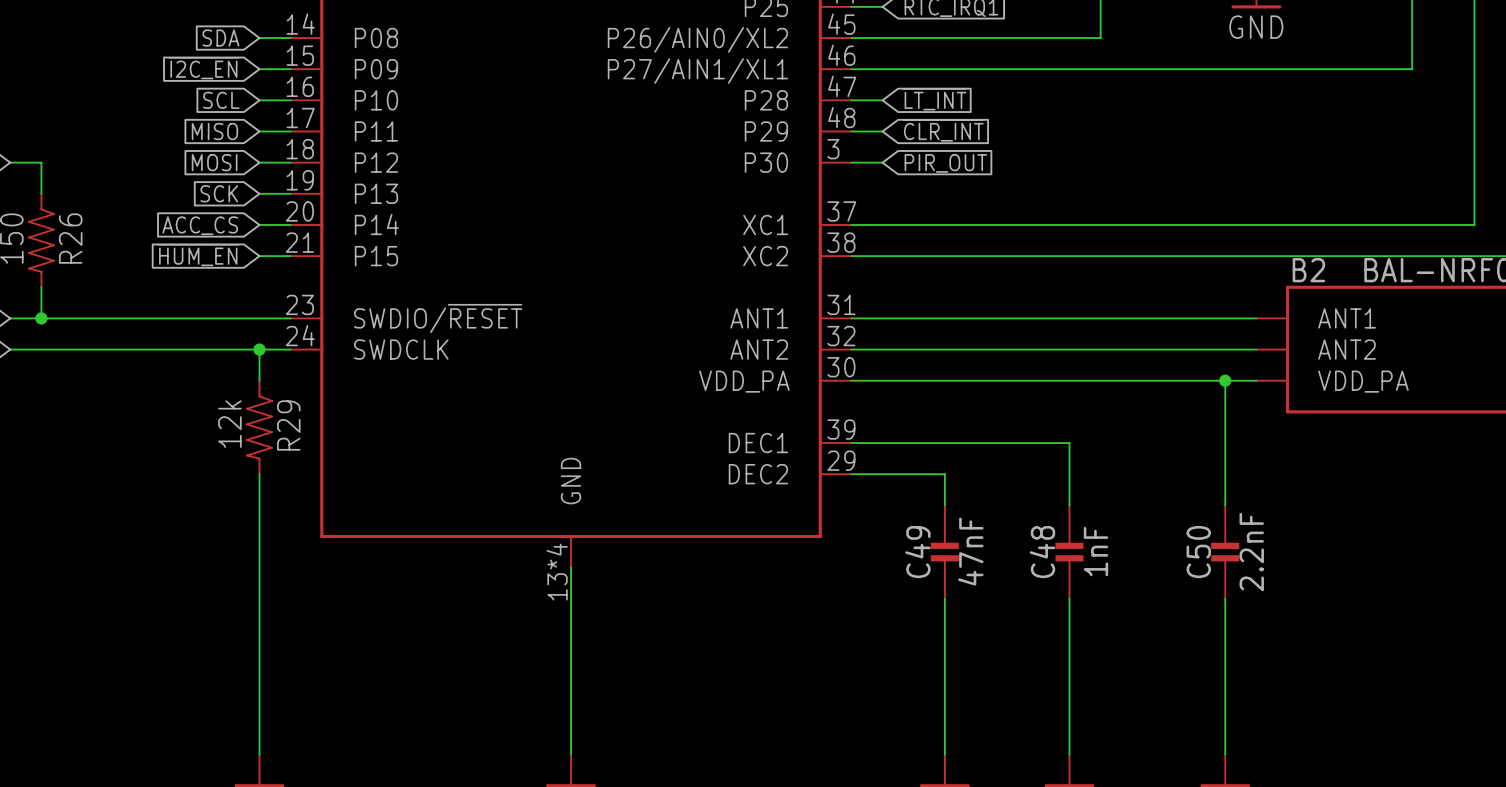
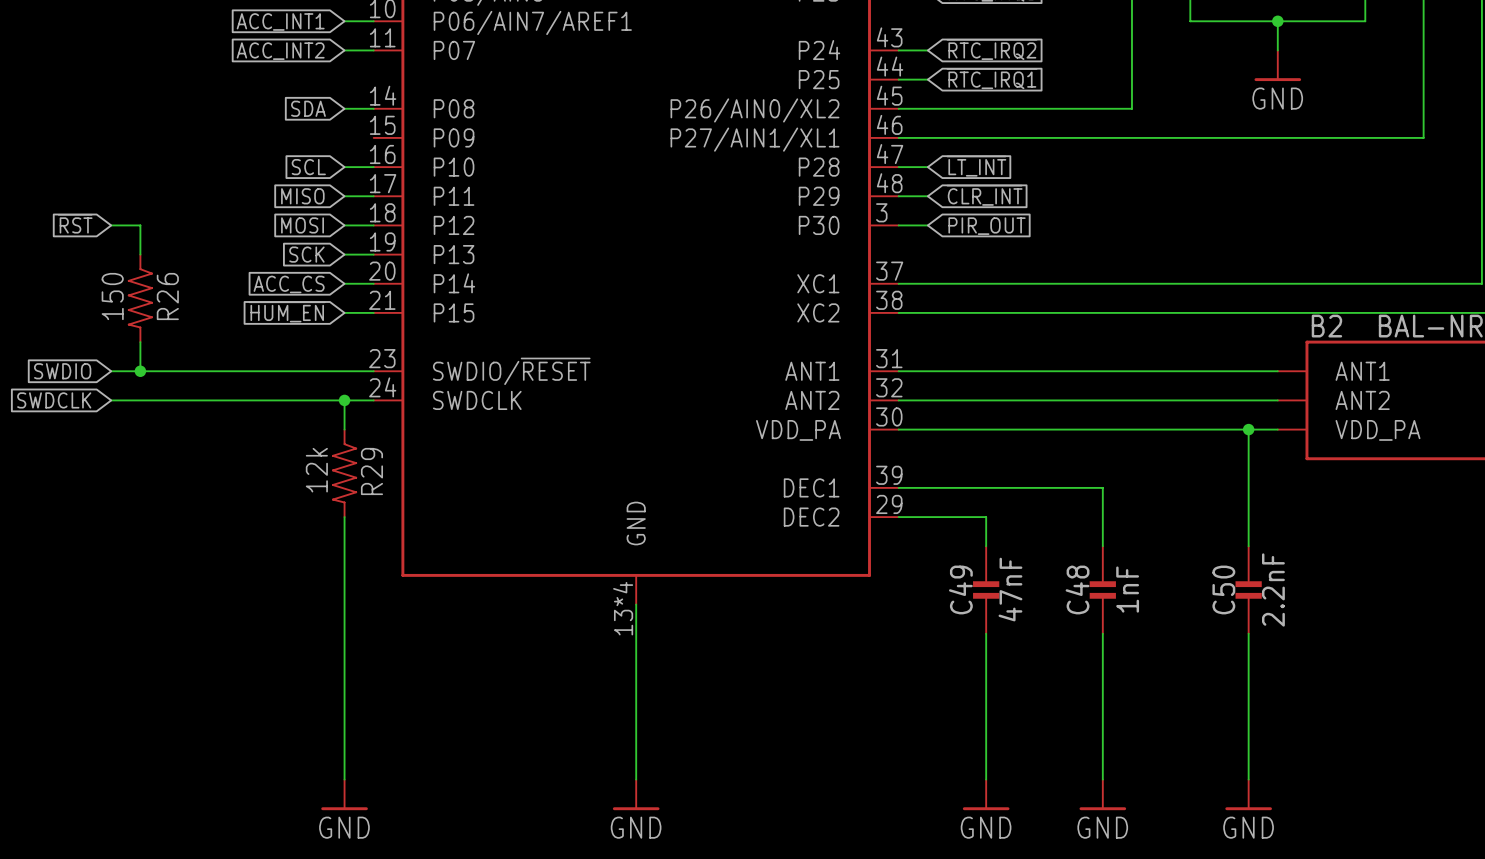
global label: ~{I2C_EN} (203, 68) -> none
wire: (259, 69) (290, 69) -> none

